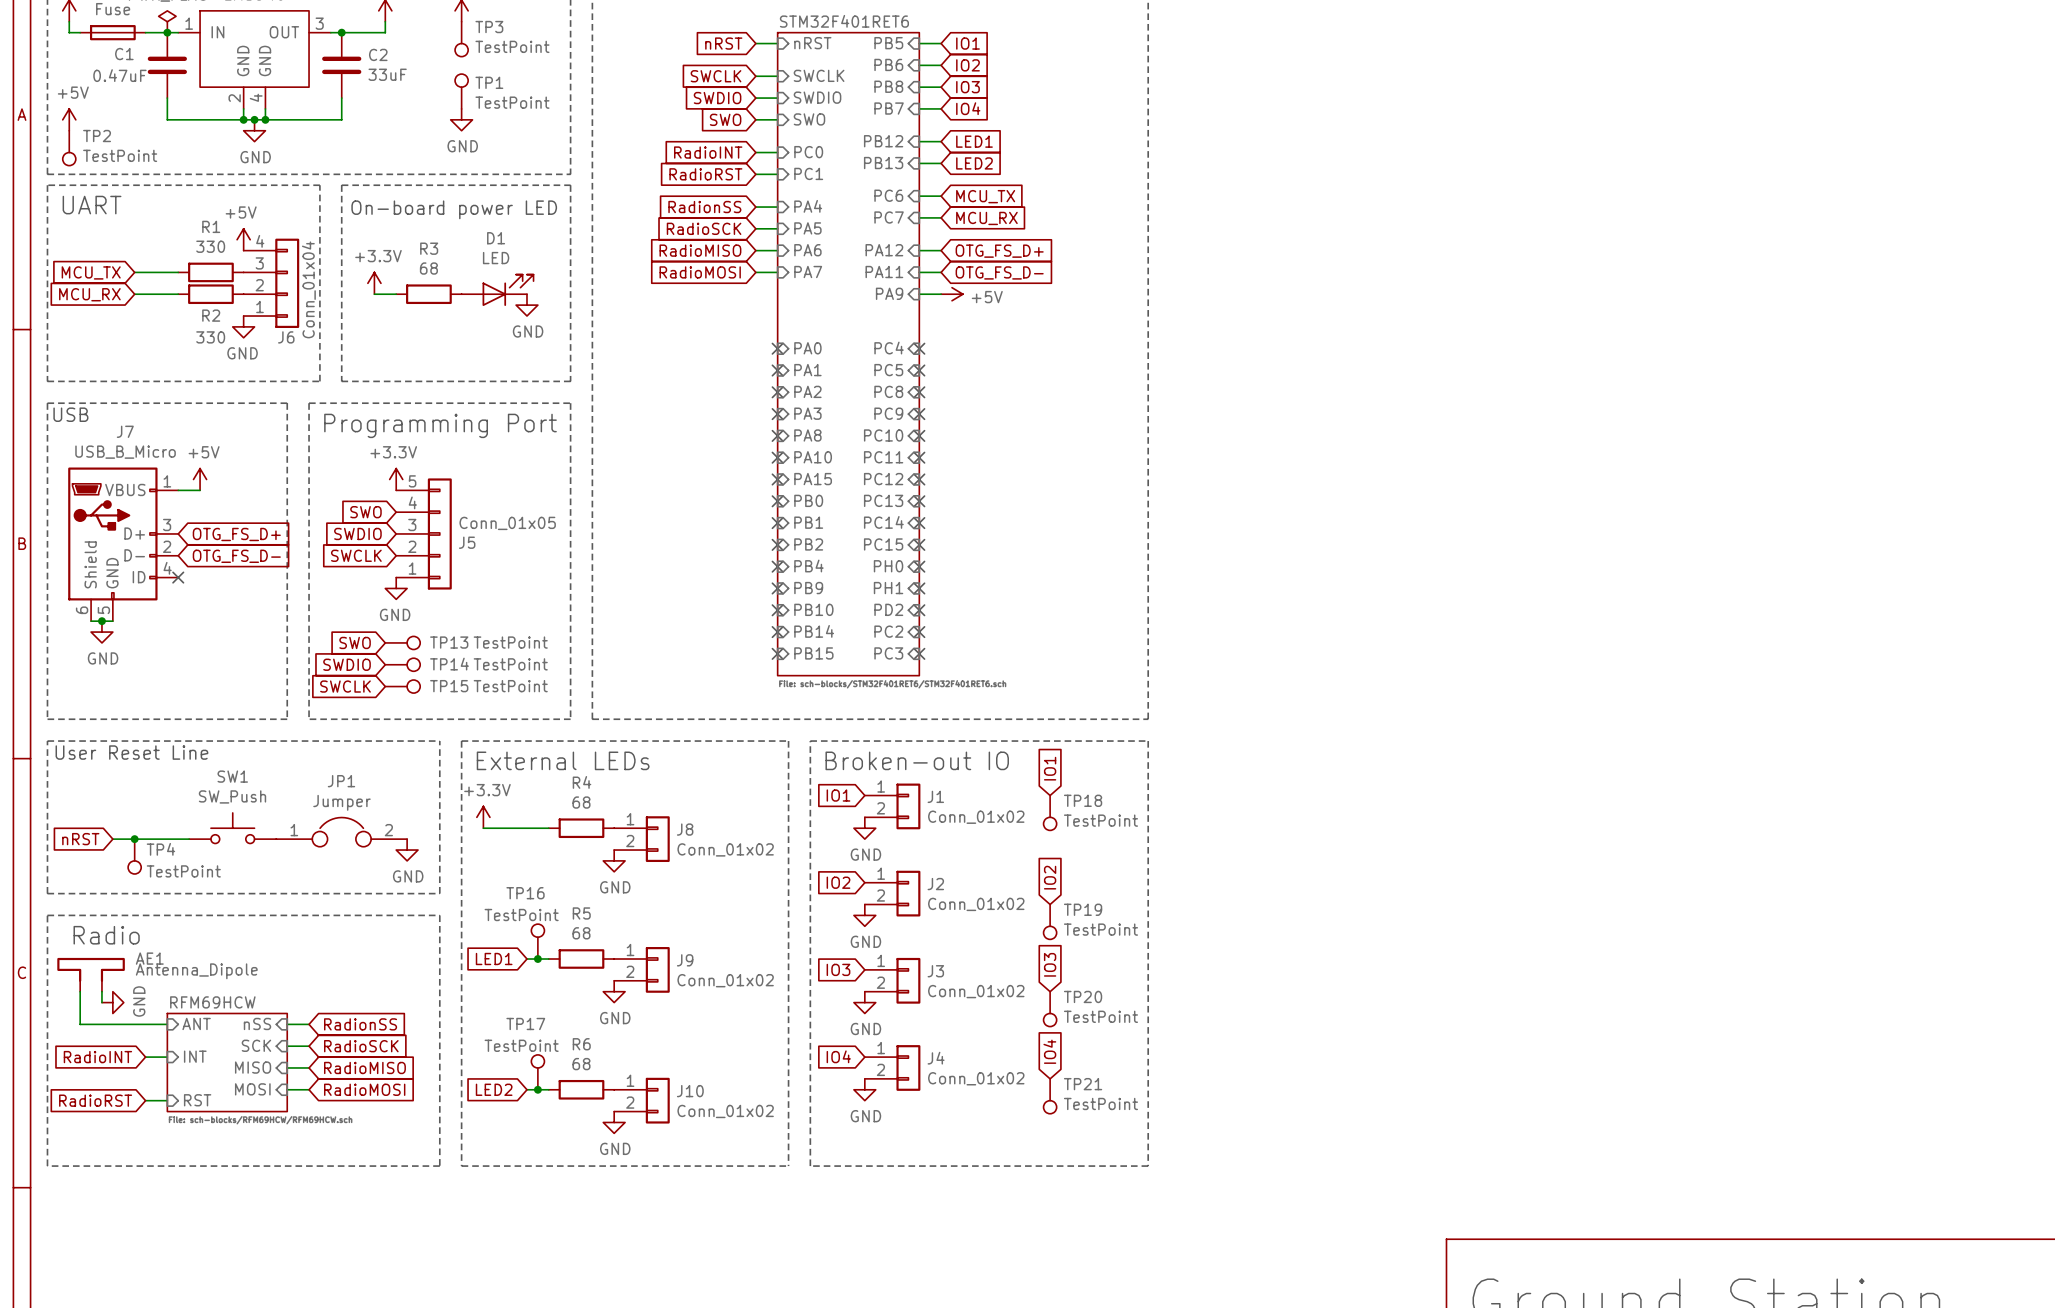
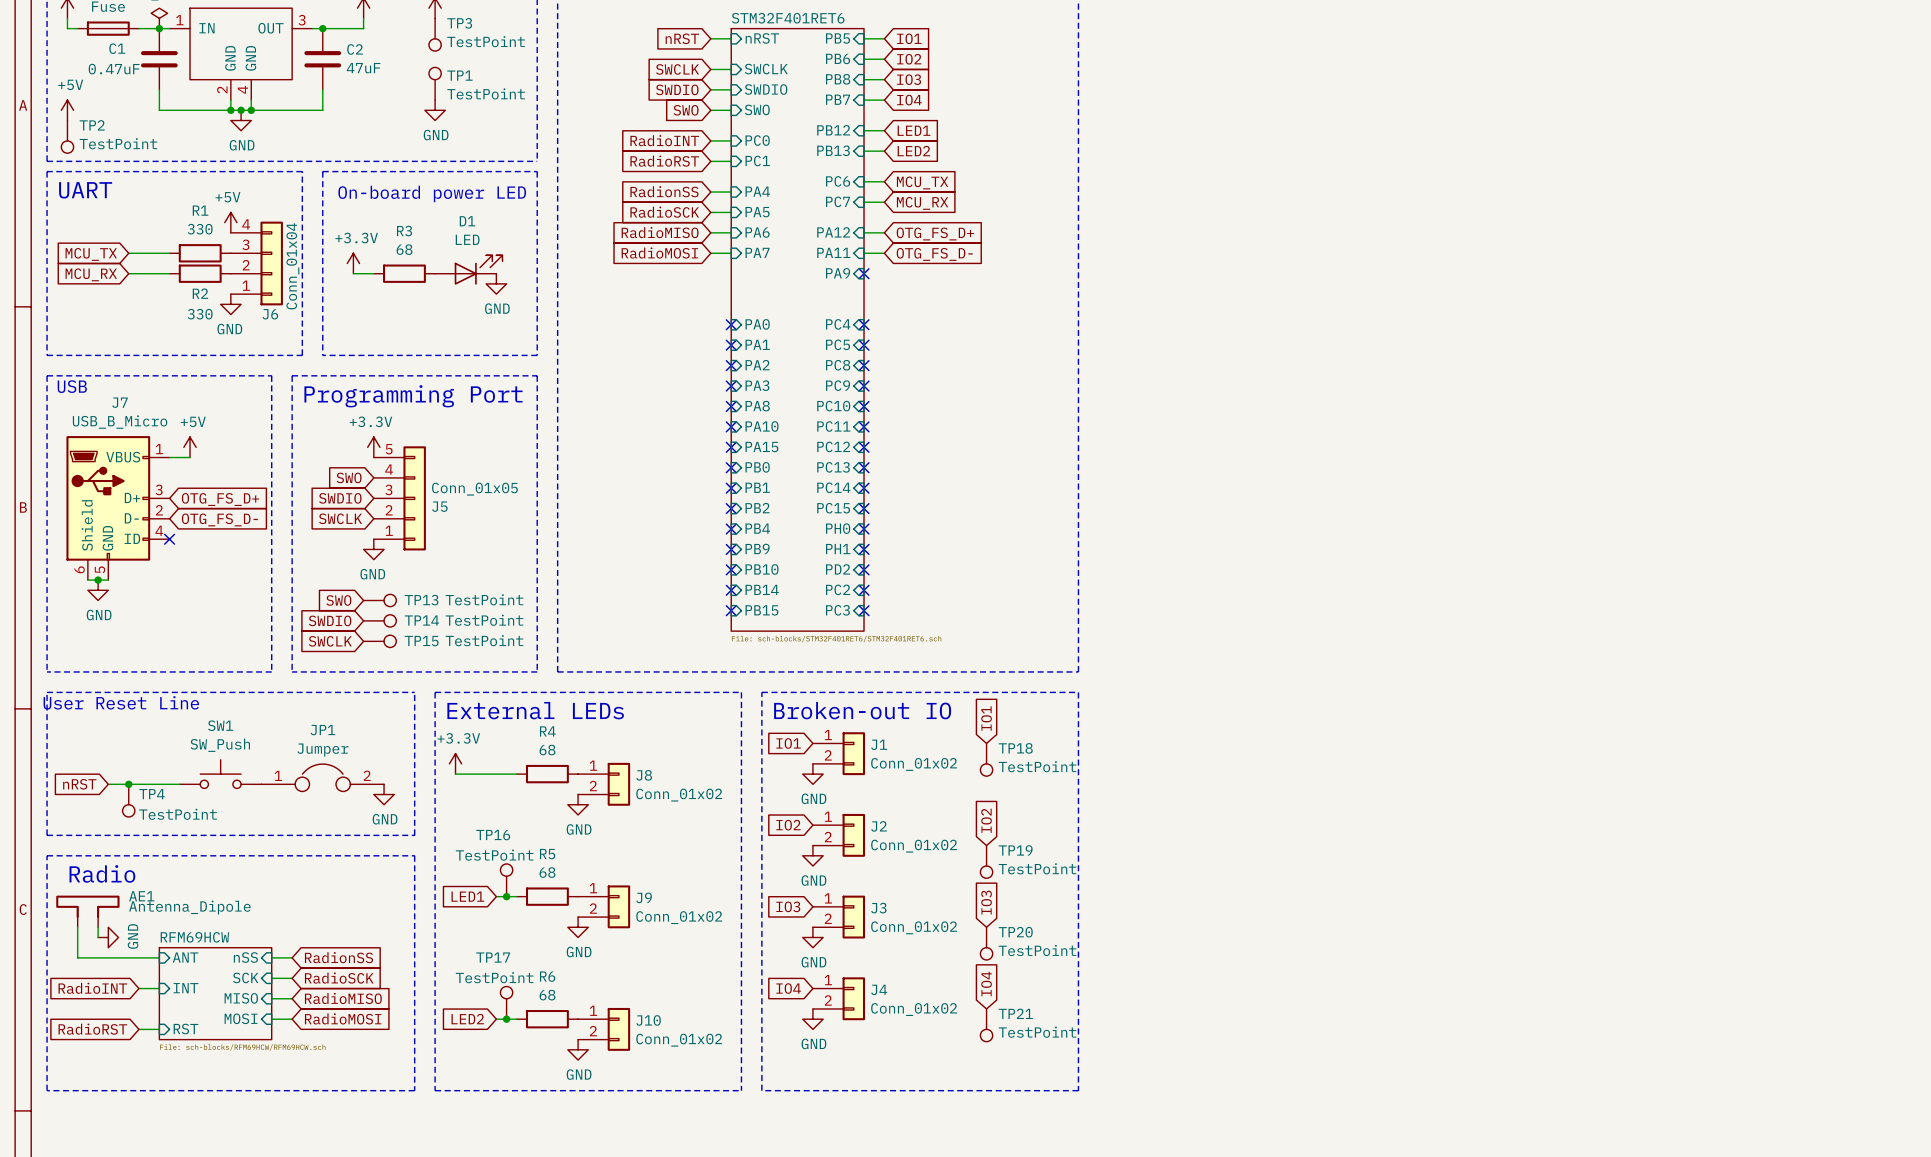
C2 value: 33uF (387, 74) -> 47uF (363, 68)
wire: (919, 294) (941, 294) -> none
no-connect mark: none -> (864, 273)
power symbol: +5V (952, 294) -> none

